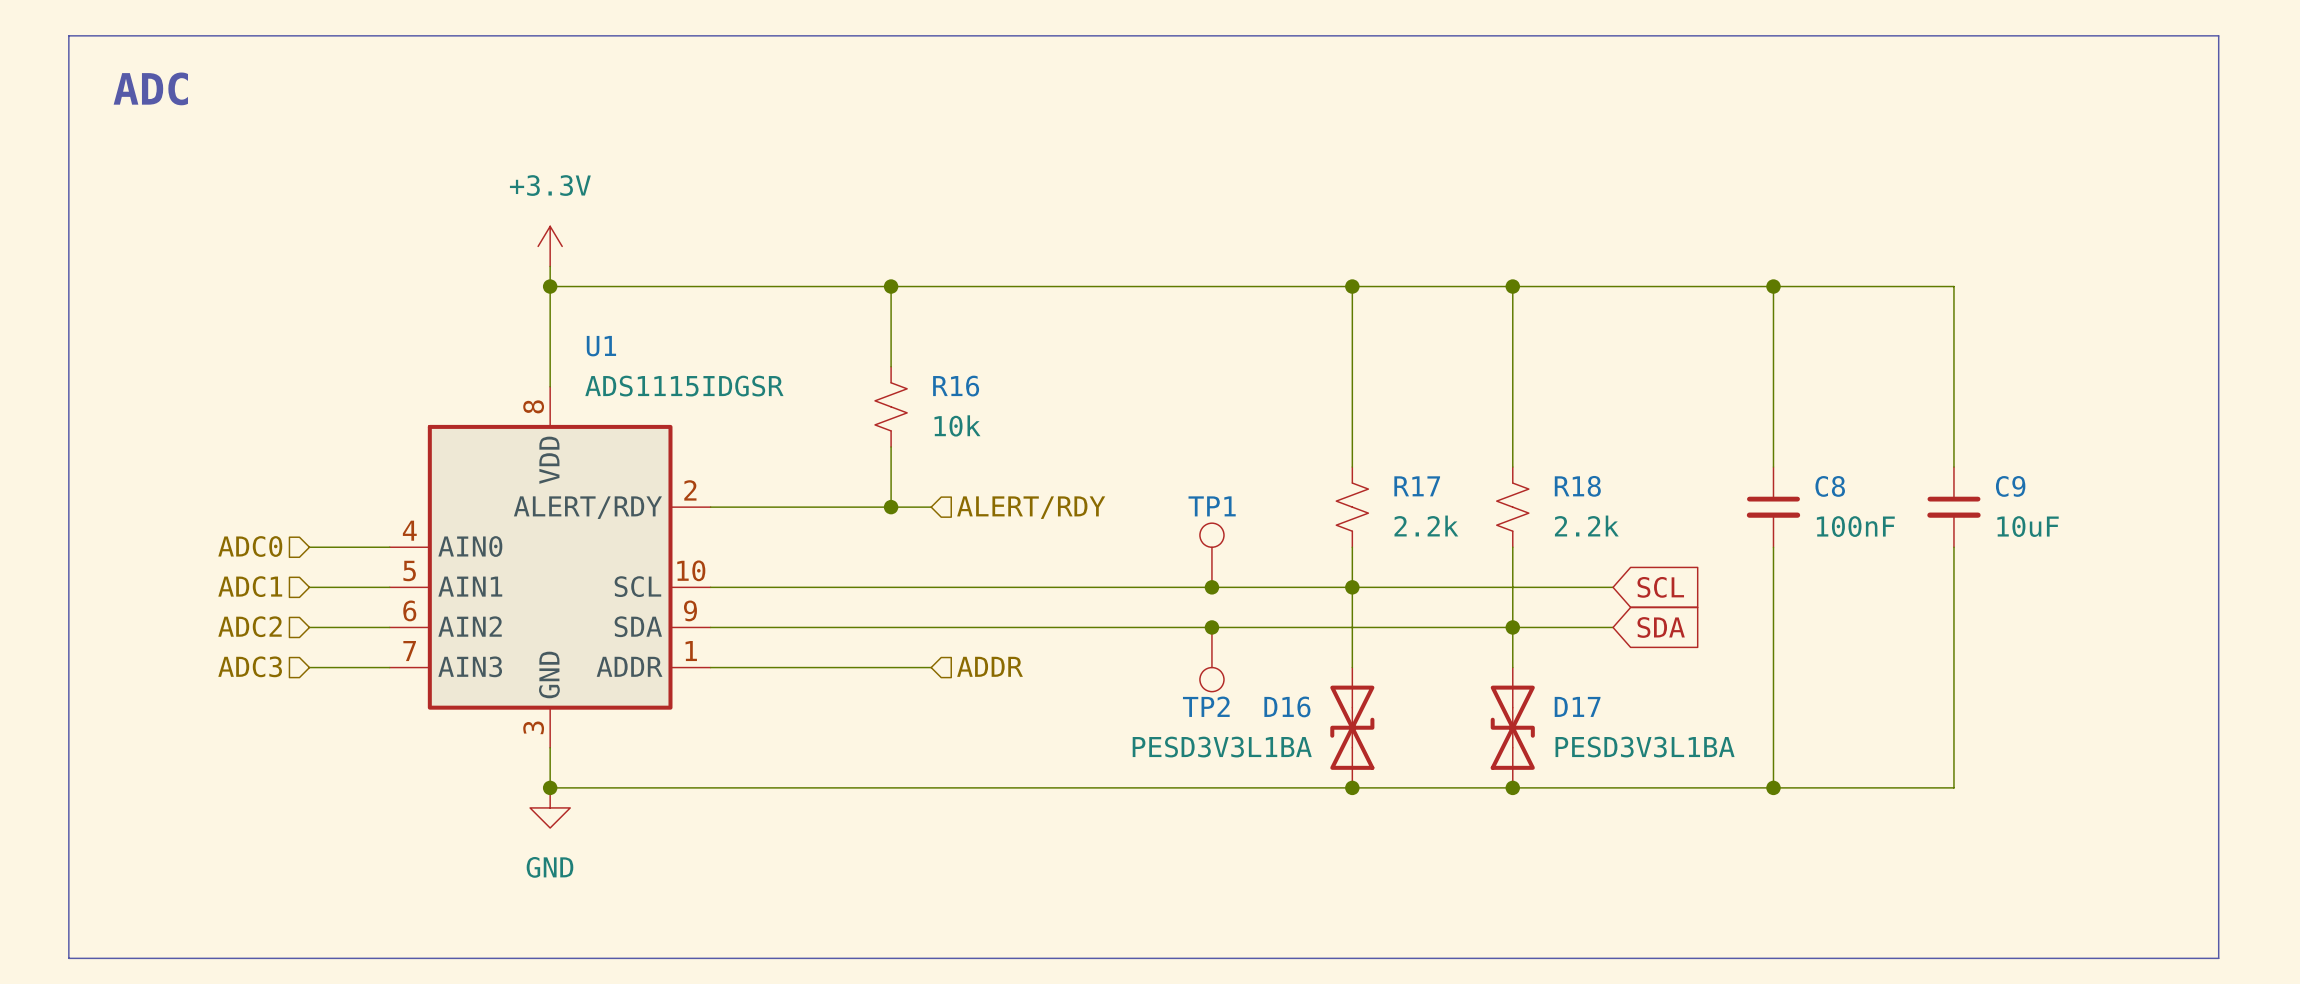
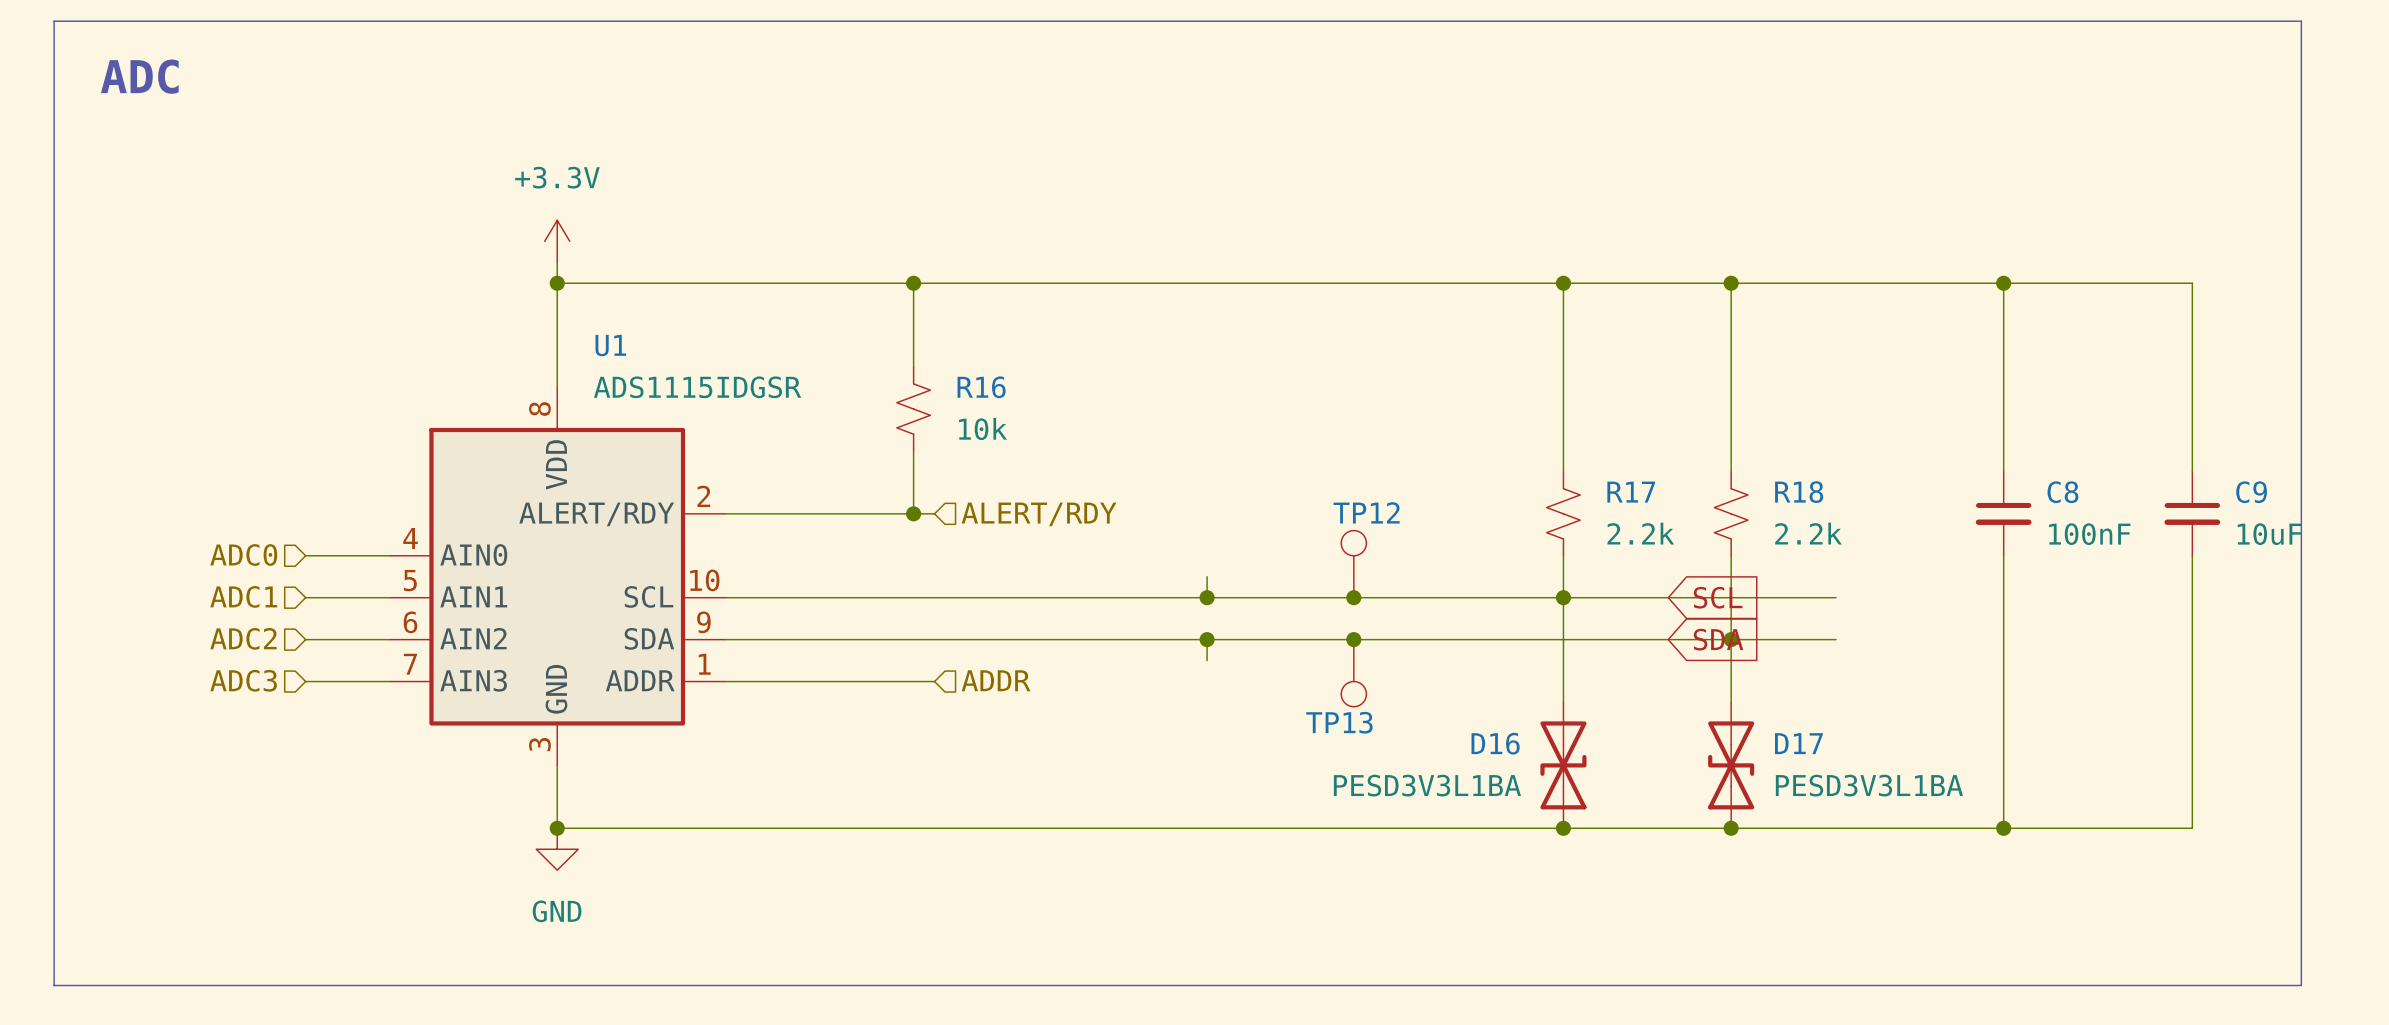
wire: (1352, 286) (1352, 467) -> none
junction: (1352, 286) -> none
junction: none -> (1731, 283)
wire: (1773, 286) (1773, 467) -> (1731, 283) (1731, 471)
junction: (1773, 286) -> none
wire: none -> (2003, 283) (2003, 471)
junction: none -> (2003, 283)
wire: (1953, 286) (1953, 467) -> (2024, 283) (2192, 283) (2192, 471)
R18 name: R18 (1577, 486) -> R17 (1631, 492)
wire: (911, 507) (931, 507) -> none
hierarchical label position: ALERT/RDY (1031, 507) -> ALERT/RDY (1039, 514)
R17: 2.2k (1352, 507) -> none
R18: none -> 2.2k (1731, 513)
C8 position: (1773, 507) -> (2003, 513)
C9 position: (1953, 507) -> (2192, 513)
wire: (1352, 547) (1352, 667) -> none
wire: none -> (1731, 555) (1731, 702)
wire: (1773, 547) (1773, 787) -> none
wire: none -> (2003, 555) (2003, 828)
wire: (1953, 547) (1953, 787) (550, 787) -> (2192, 555) (2192, 828) (557, 828) (557, 807)
TP1: (1211, 555) -> none
TP12: none -> (1353, 564)
wire: none -> (1207, 576) (1207, 597)
junction: none -> (1207, 597)
junction: (1211, 587) -> none
junction: none -> (1353, 597)
junction: (1352, 587) -> none
wire: none -> (1668, 597) (1835, 597)
wire: none -> (1207, 639) (1207, 660)
junction: none -> (1207, 639)
junction: (1211, 627) -> none
junction: none -> (1353, 639)
junction position: (1512, 627) -> (1563, 597)
wire: none -> (1668, 639) (1835, 639)
junction: none -> (1731, 639)
TP2: (1211, 659) -> none
TP13: none -> (1353, 673)
hierarchical label position: ADDR (990, 666) -> ADDR (996, 680)
wire: (911, 667) (931, 667) -> none
D16 position: (1352, 727) -> (1563, 765)
D17 position: (1512, 727) -> (1731, 765)
junction position: (550, 787) -> (557, 828)
junction: (1352, 787) -> none
junction position: (1512, 787) -> (1563, 828)
junction: (1773, 787) -> none
power symbol position: GND (550, 807) -> GND (557, 849)
junction: none -> (1731, 828)
junction: none -> (2003, 828)

